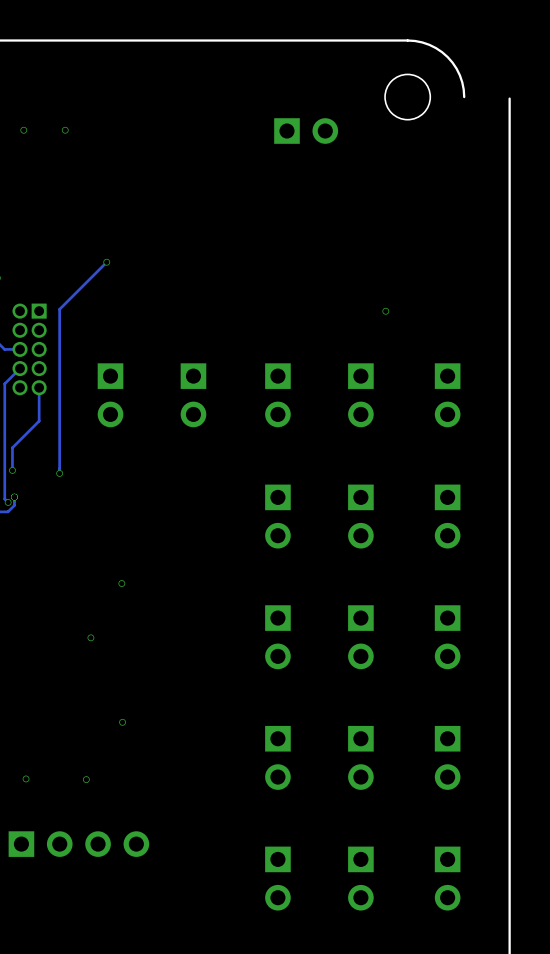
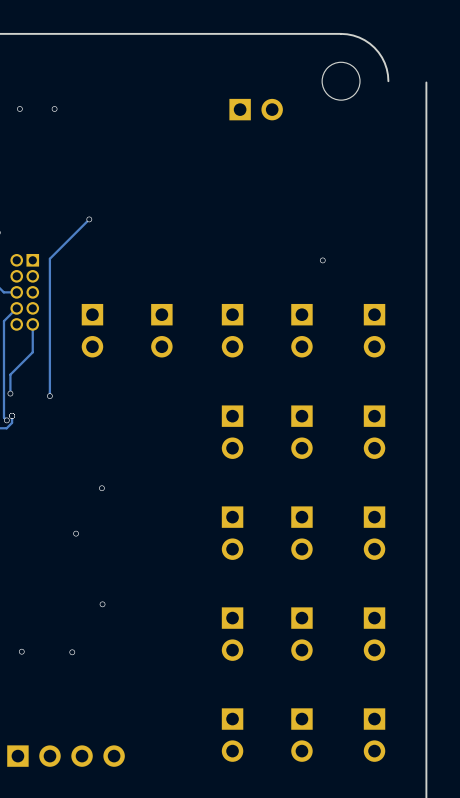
part position: (78, 844) -> (66, 756)

